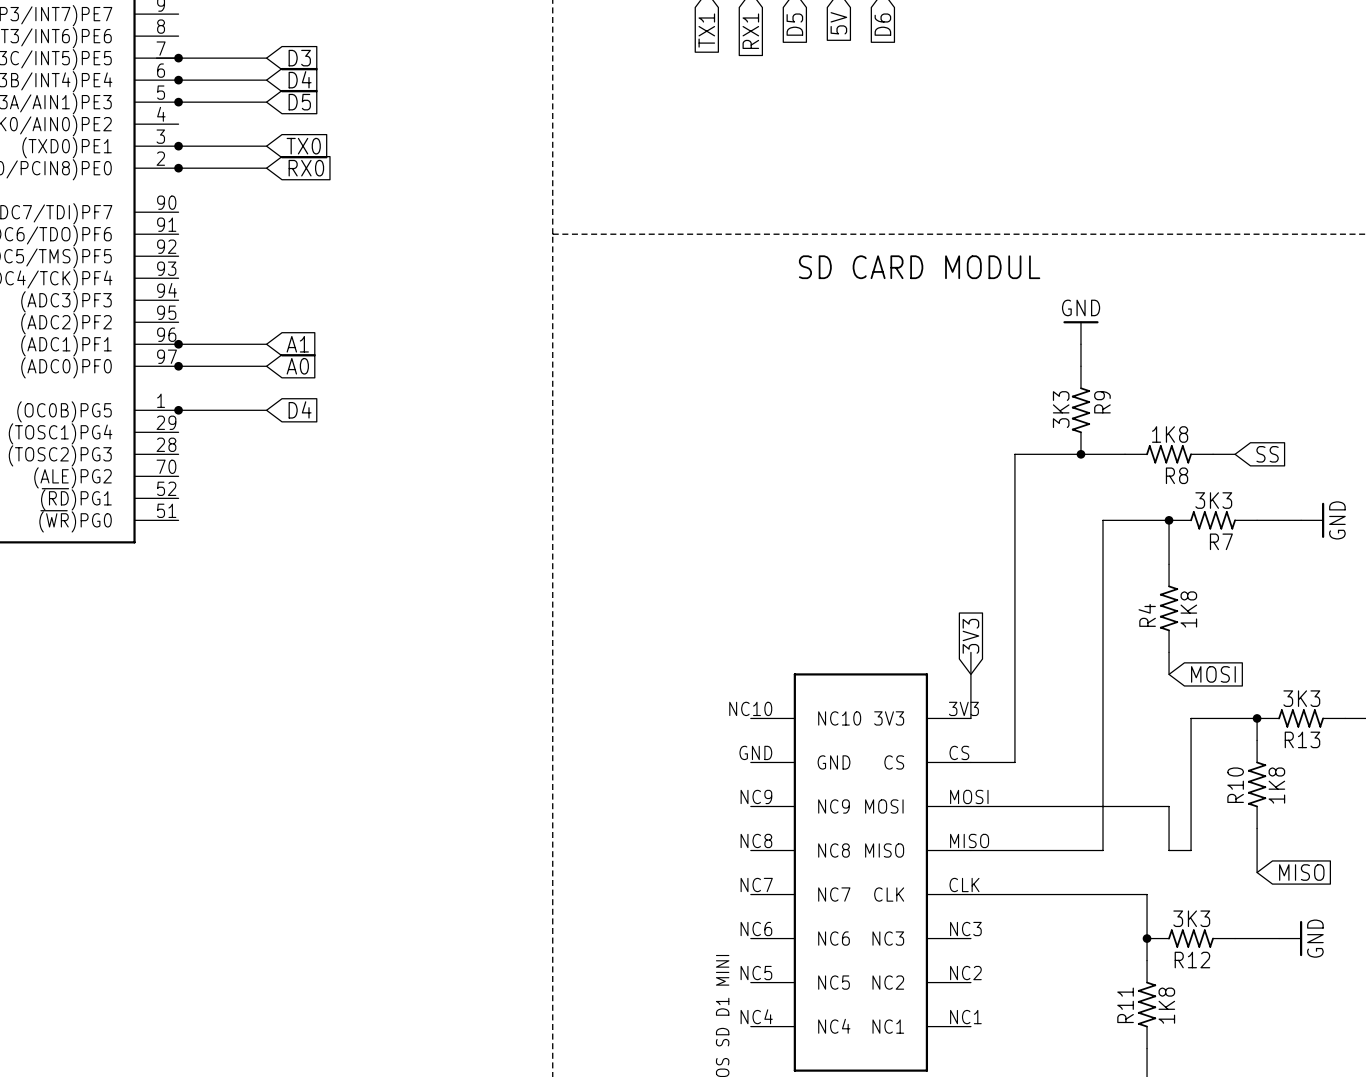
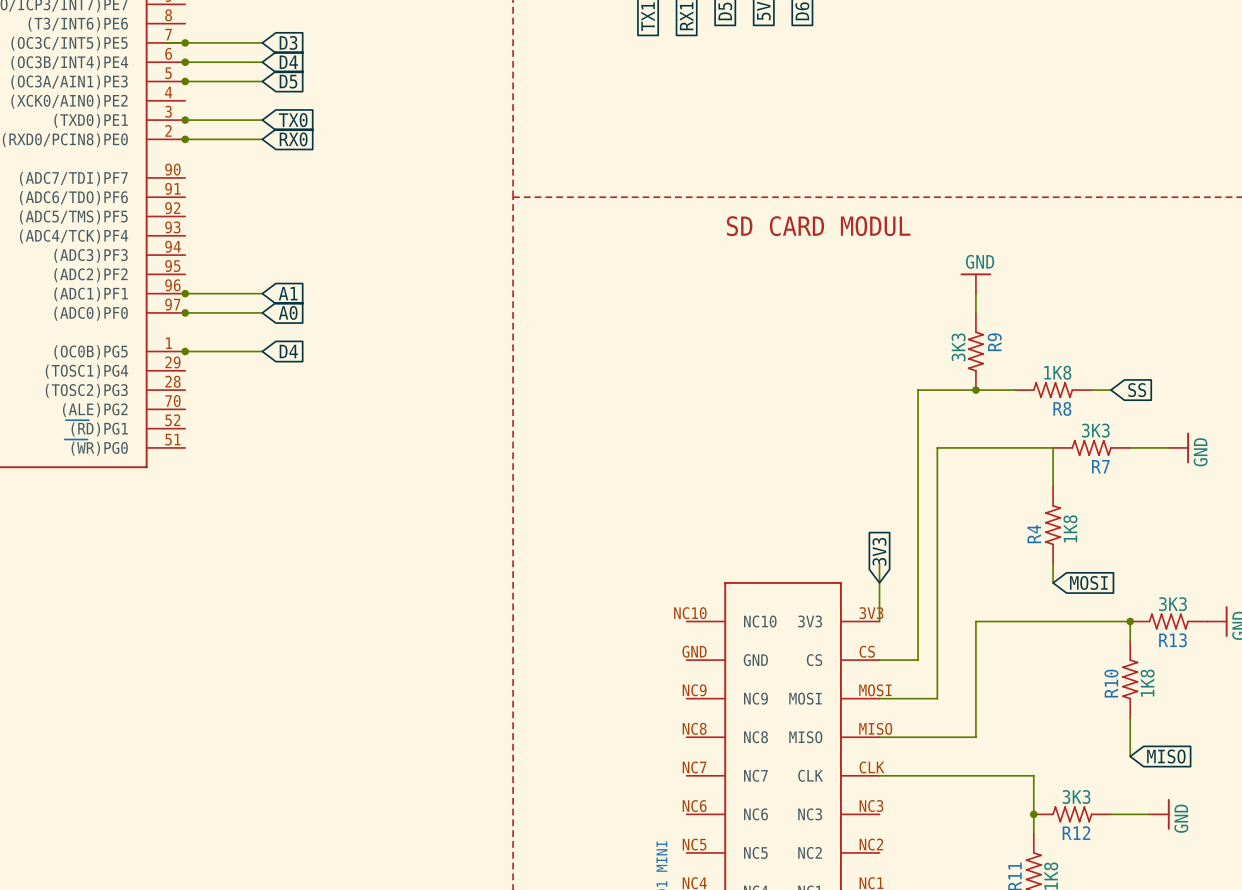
wire: (1103, 520) (1103, 850) (1080, 850) -> (995, 447) (937, 447) (937, 698)
junction: (1169, 520) -> none
wire: (1191, 718) (1191, 850) (1169, 850) (1169, 806) (1036, 806) -> (1072, 621) (975, 621) (975, 737)

